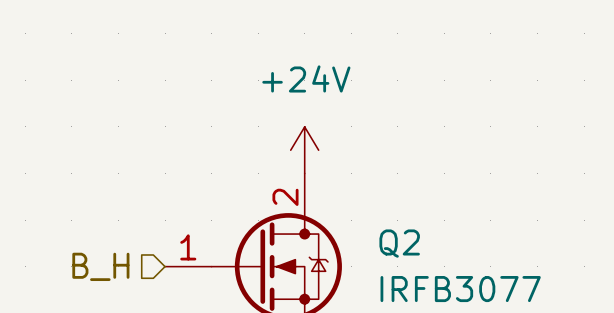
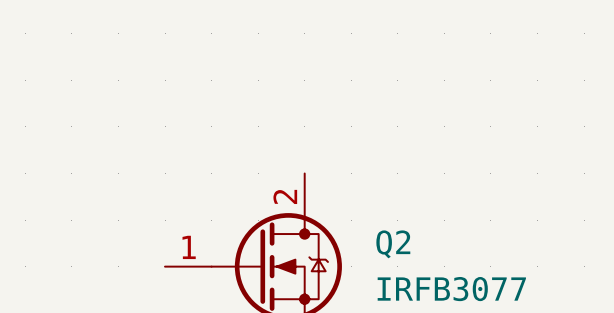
power symbol: +24V (304, 150) -> none
hierarchical label: B_H (100, 266) -> none

